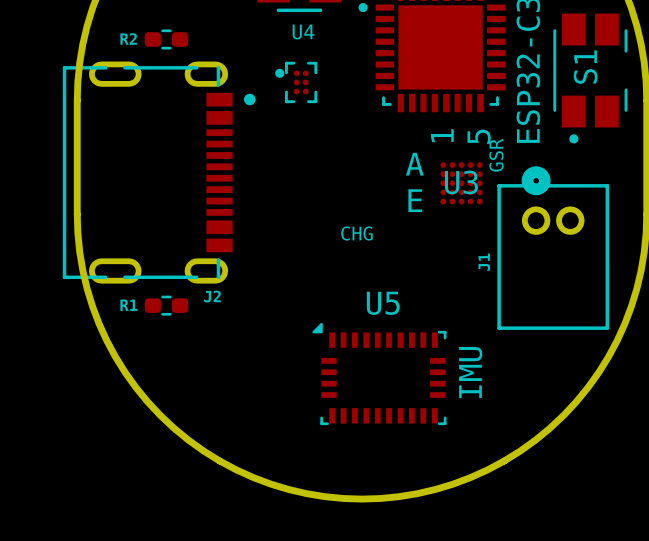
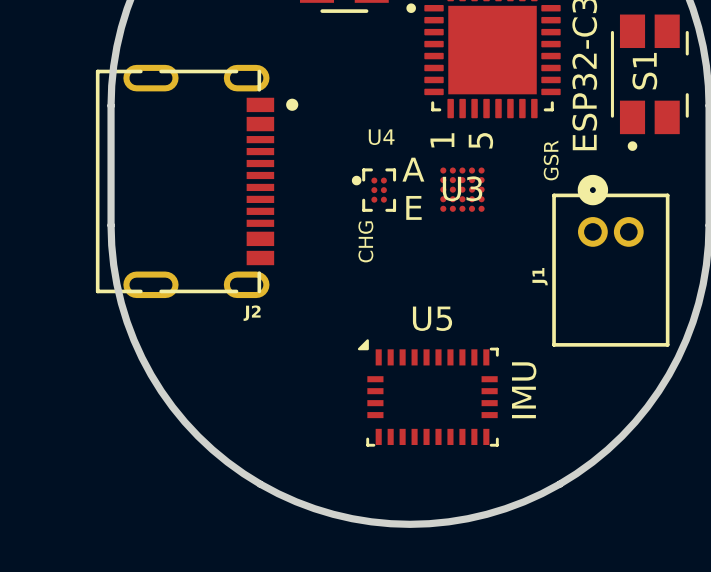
R2: (166, 39) -> none
U4 position: (296, 82) -> (373, 190)
U3 position: (461, 183) -> (462, 189)
text rotation: 0° (356, 233) -> 90° counterclockwise (365, 241)
R1: (166, 305) -> none

